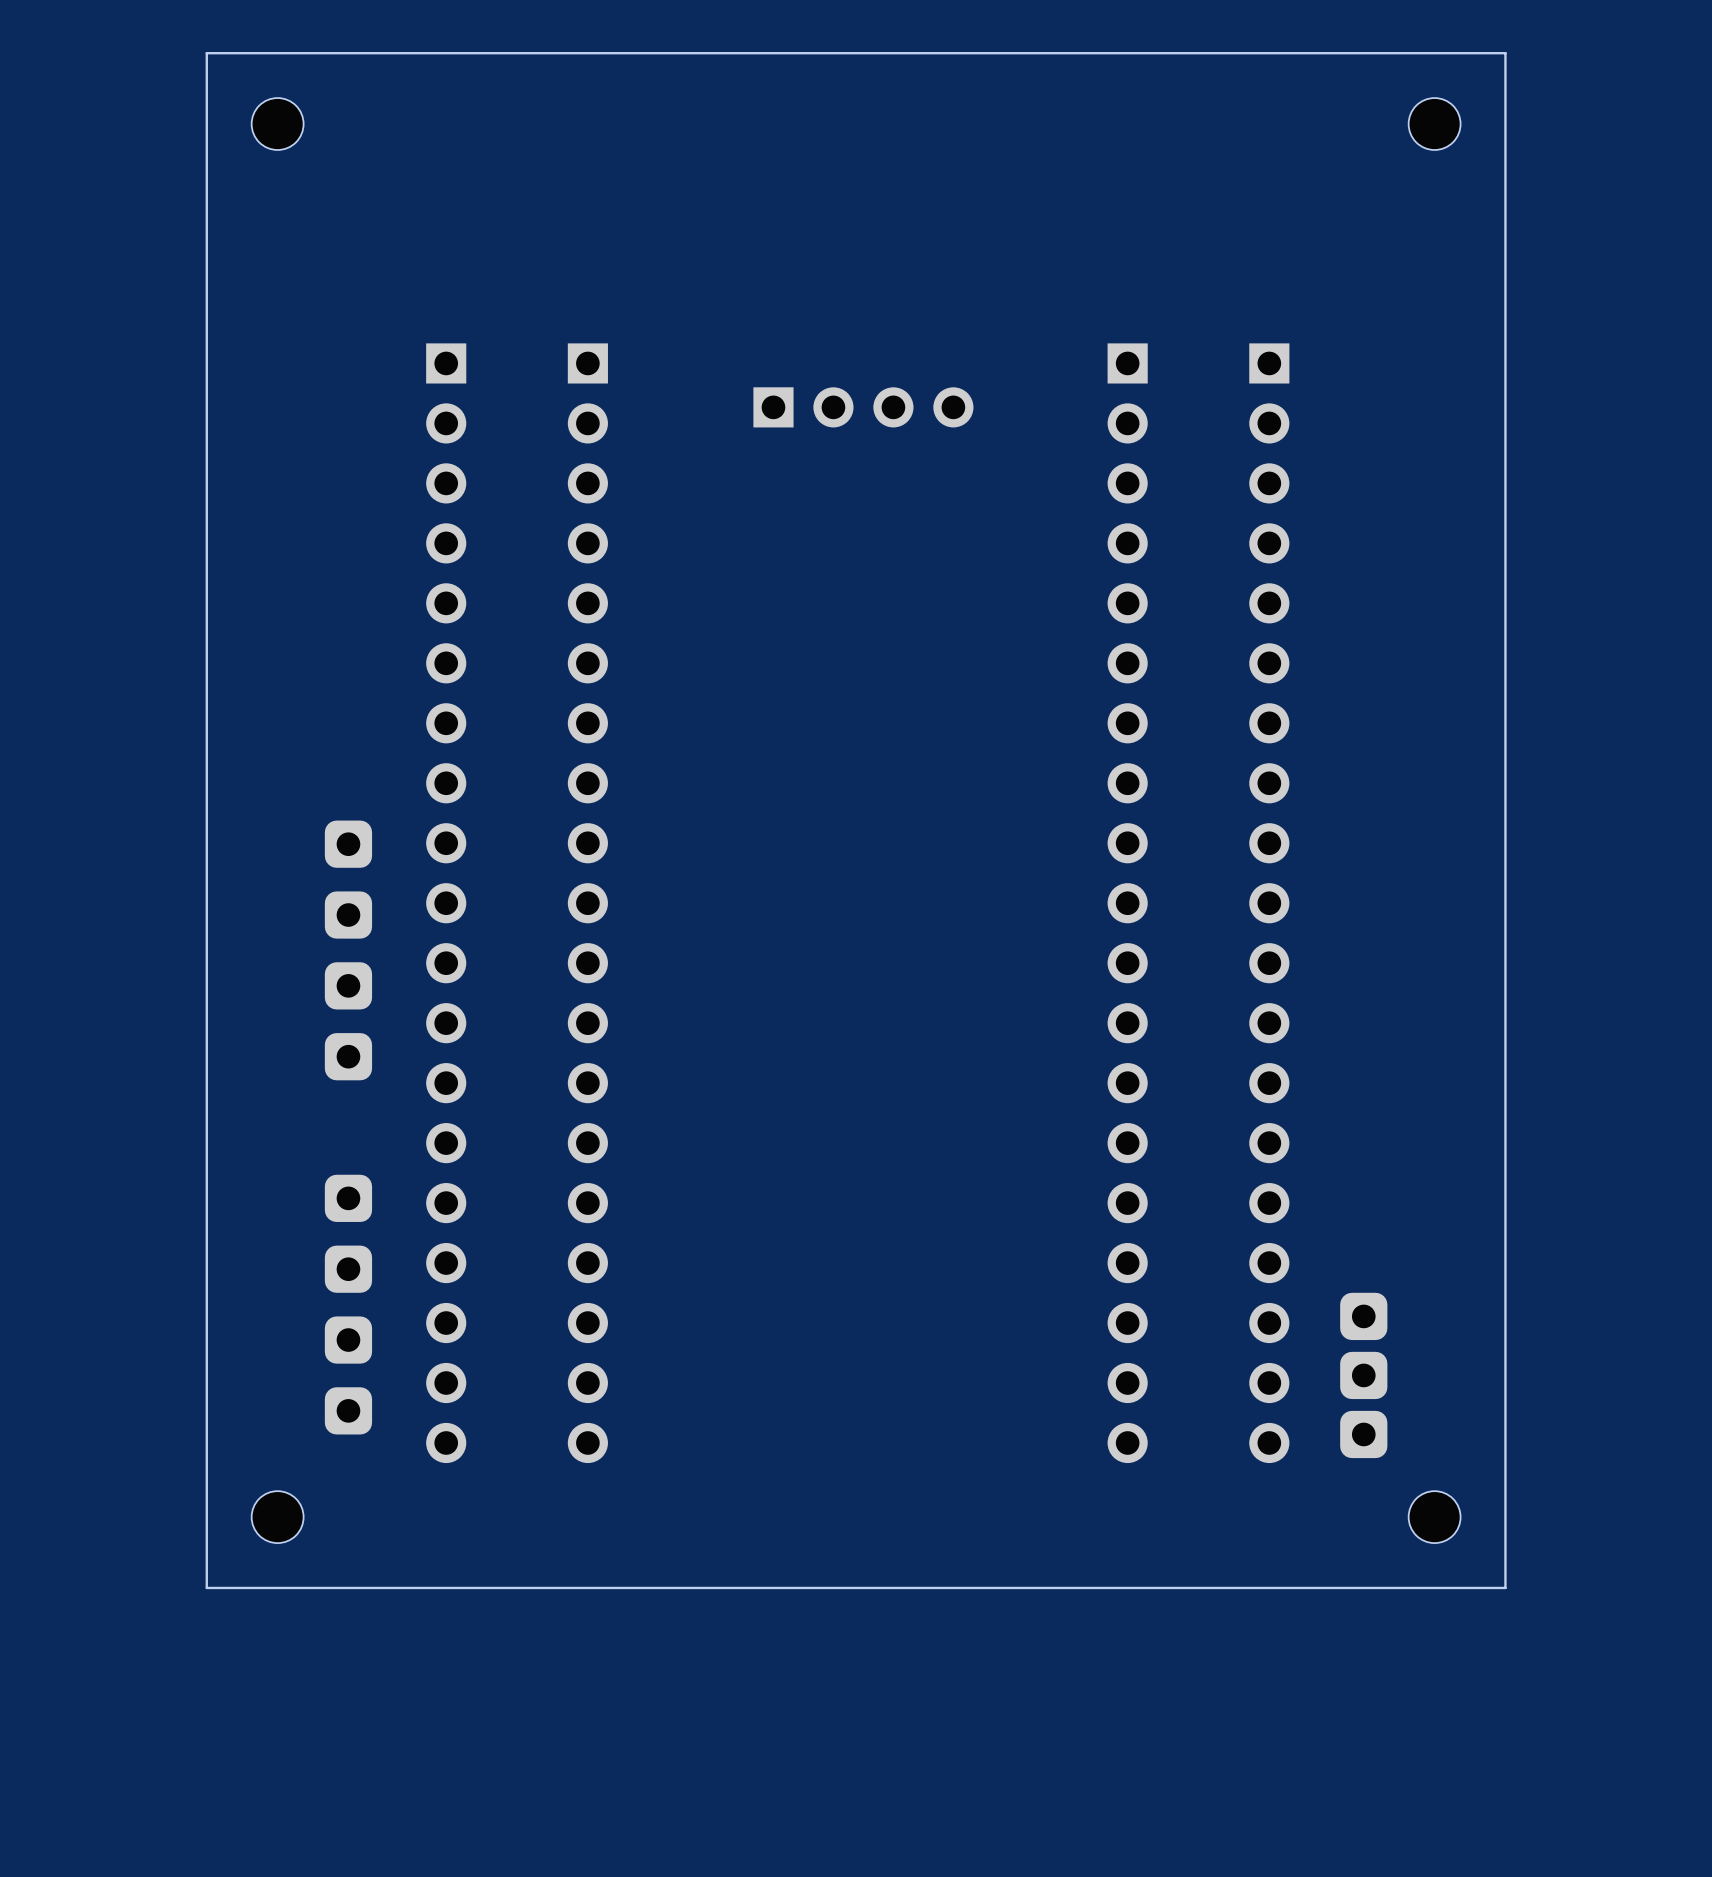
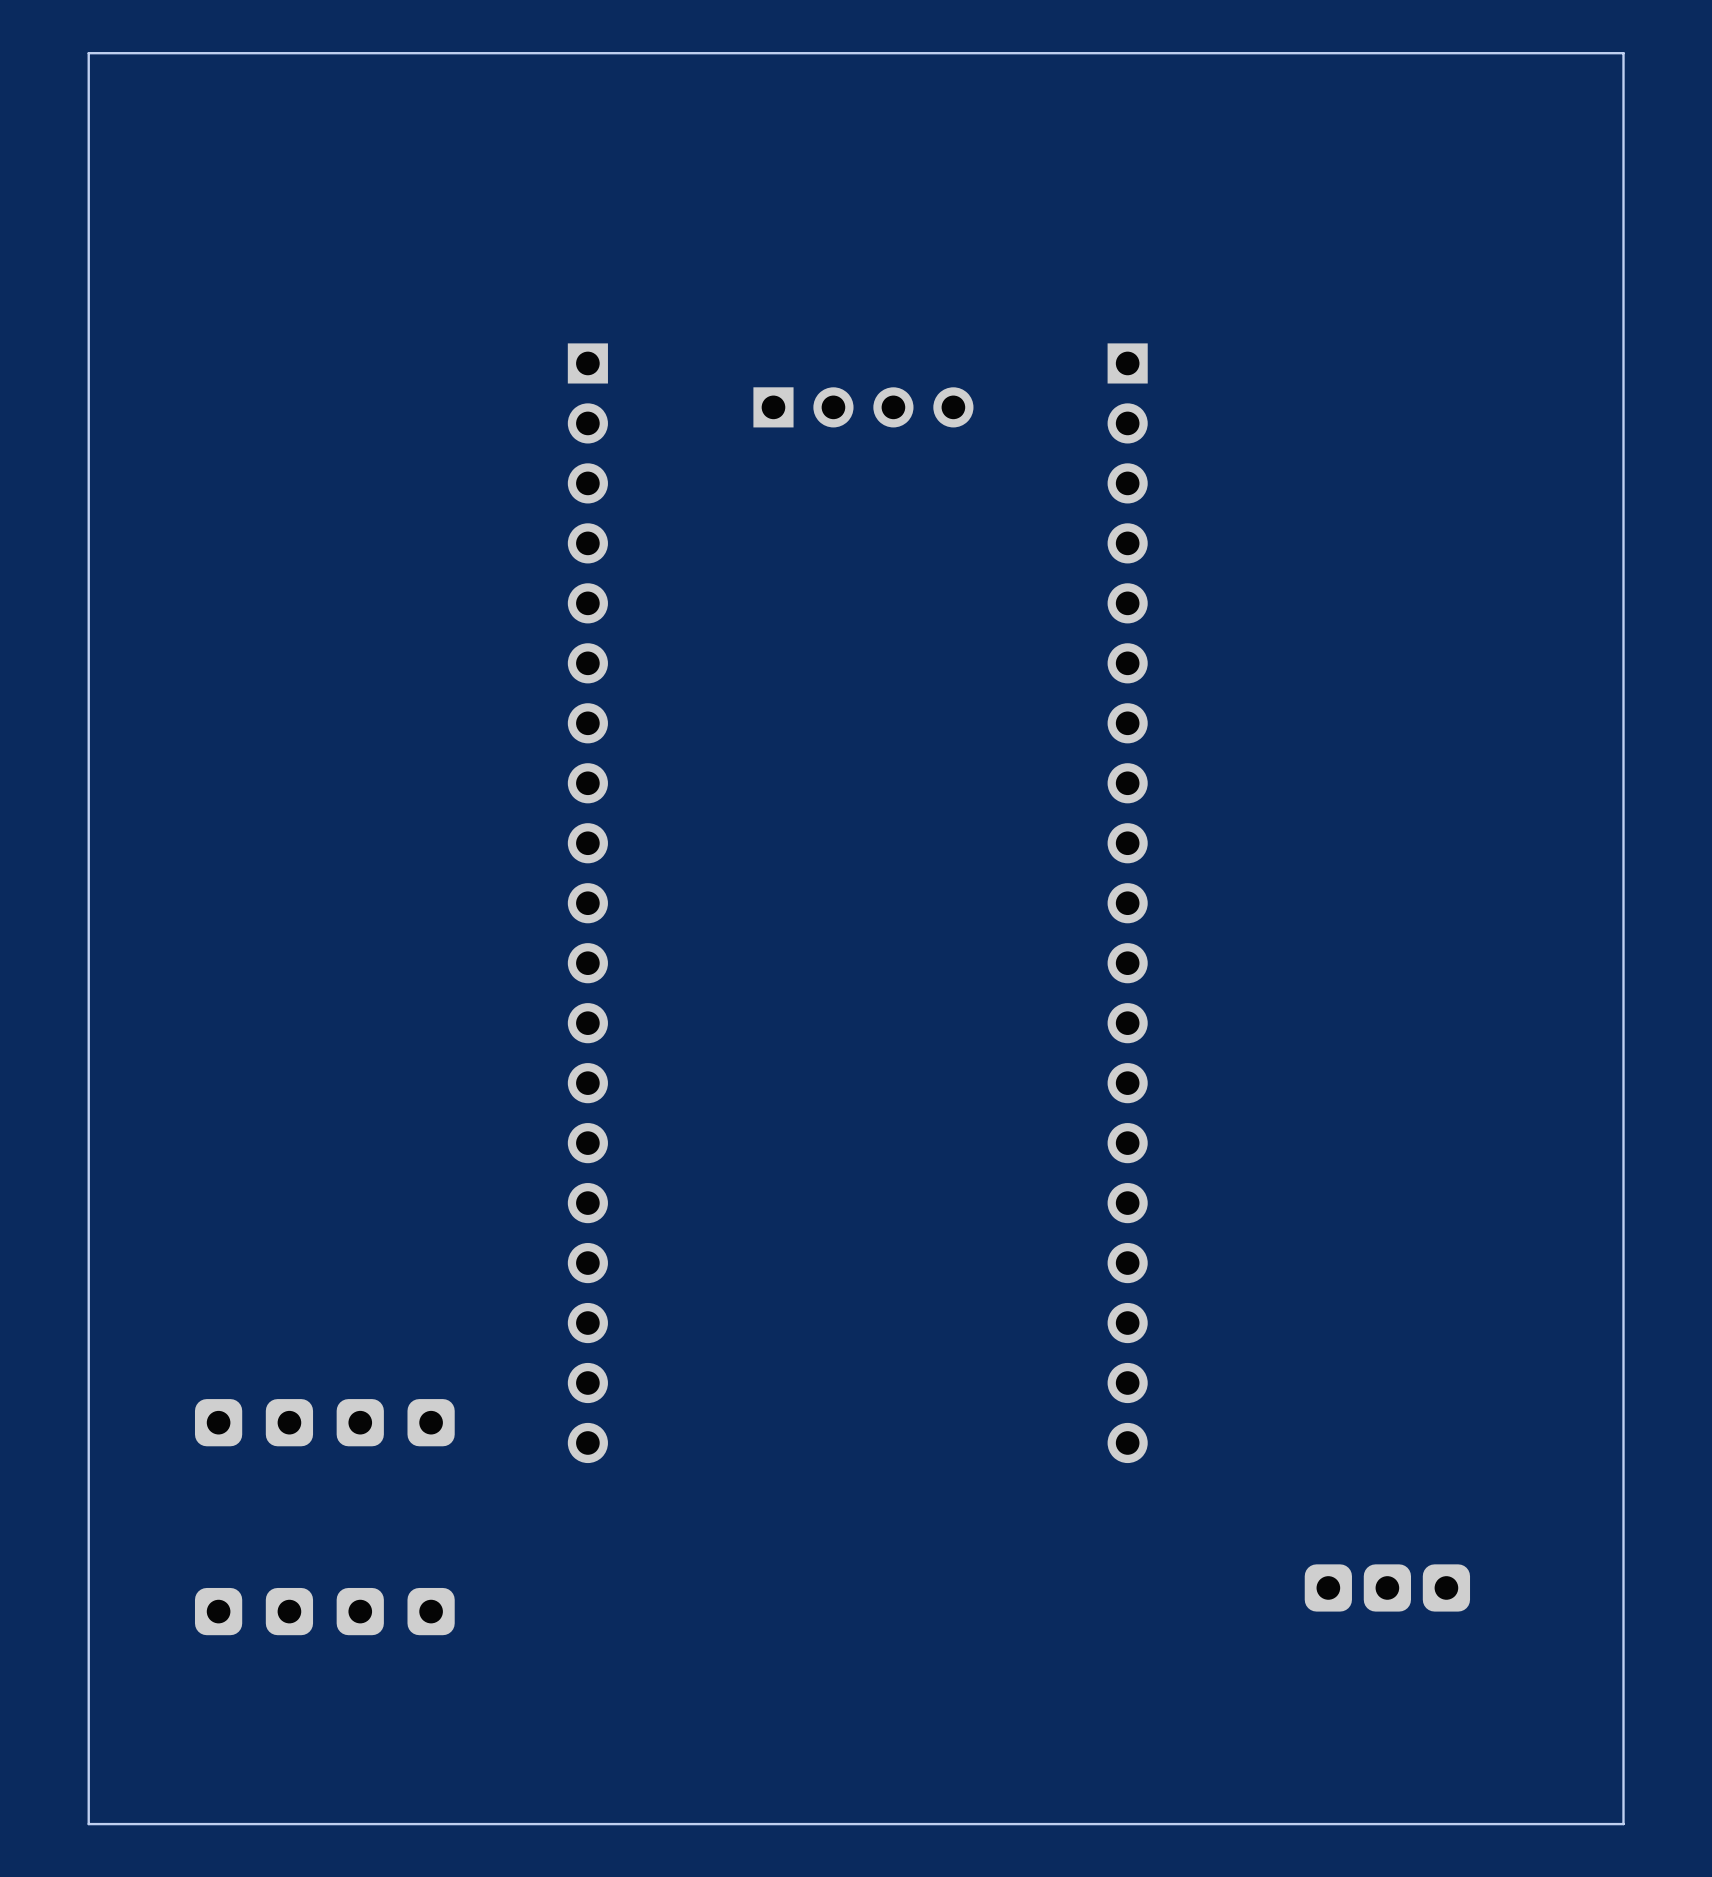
board edge: (1505, 53) (1505, 1587) (206, 1587) (206, 53) -> (1505, 53) (1623, 53) (1623, 1824) (88, 1824) (88, 53) (206, 53)
part: (277, 124) -> none
part: (1434, 124) -> none
part: (446, 903) -> none
part: (1269, 903) -> none
part: (348, 950) -> none
part rotation: 0° (348, 1304) -> 90° clockwise (324, 1422)
part rotation: 0° (1363, 1375) -> 90° clockwise (1387, 1587)
part position: (1363, 1375) -> (1387, 1587)
part: (277, 1517) -> none
part: (1434, 1517) -> none
part: none -> (324, 1611)

